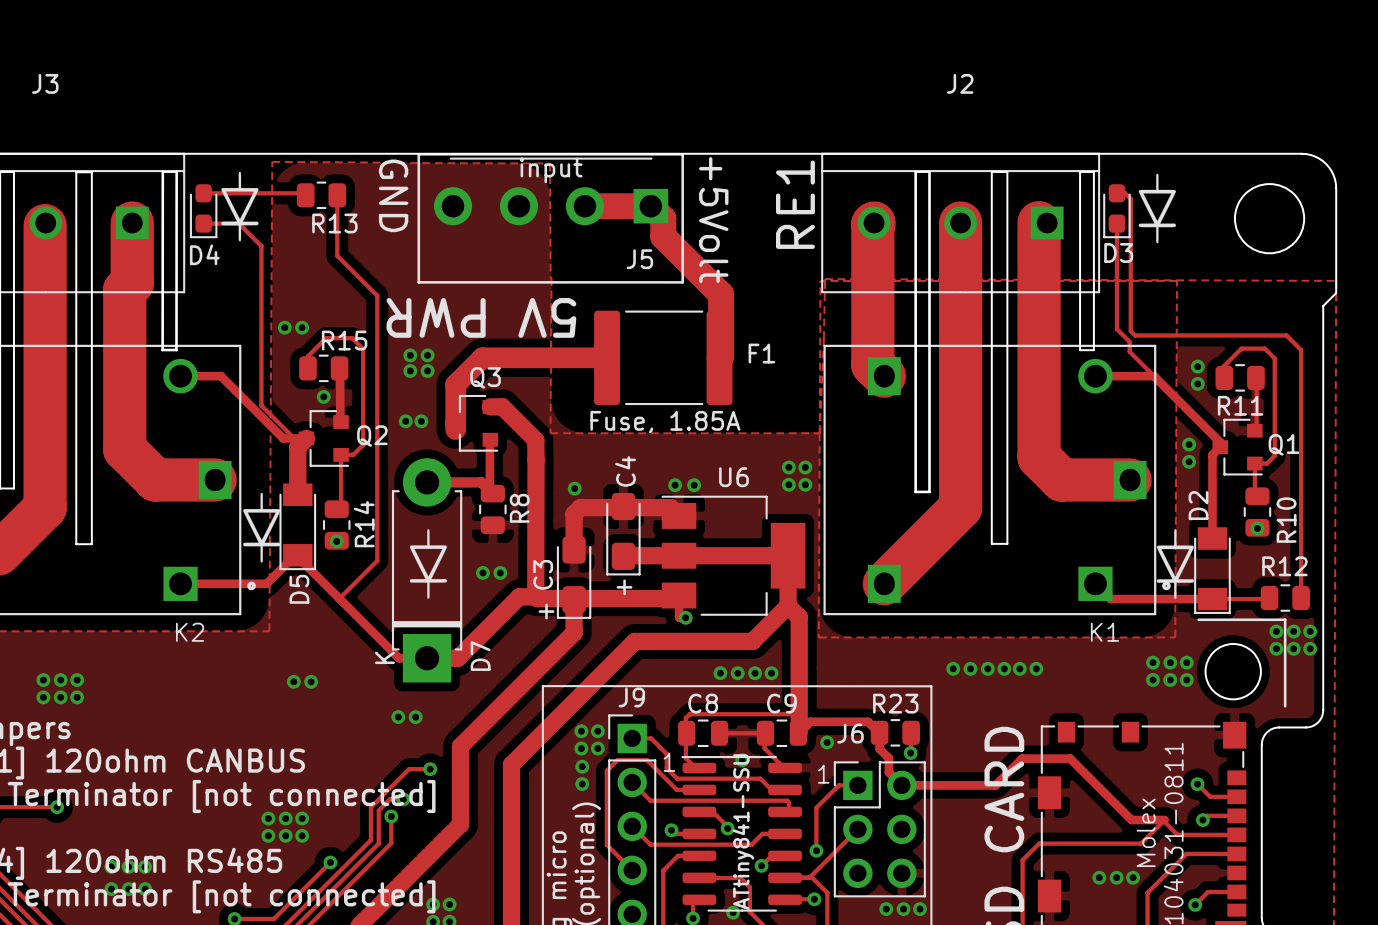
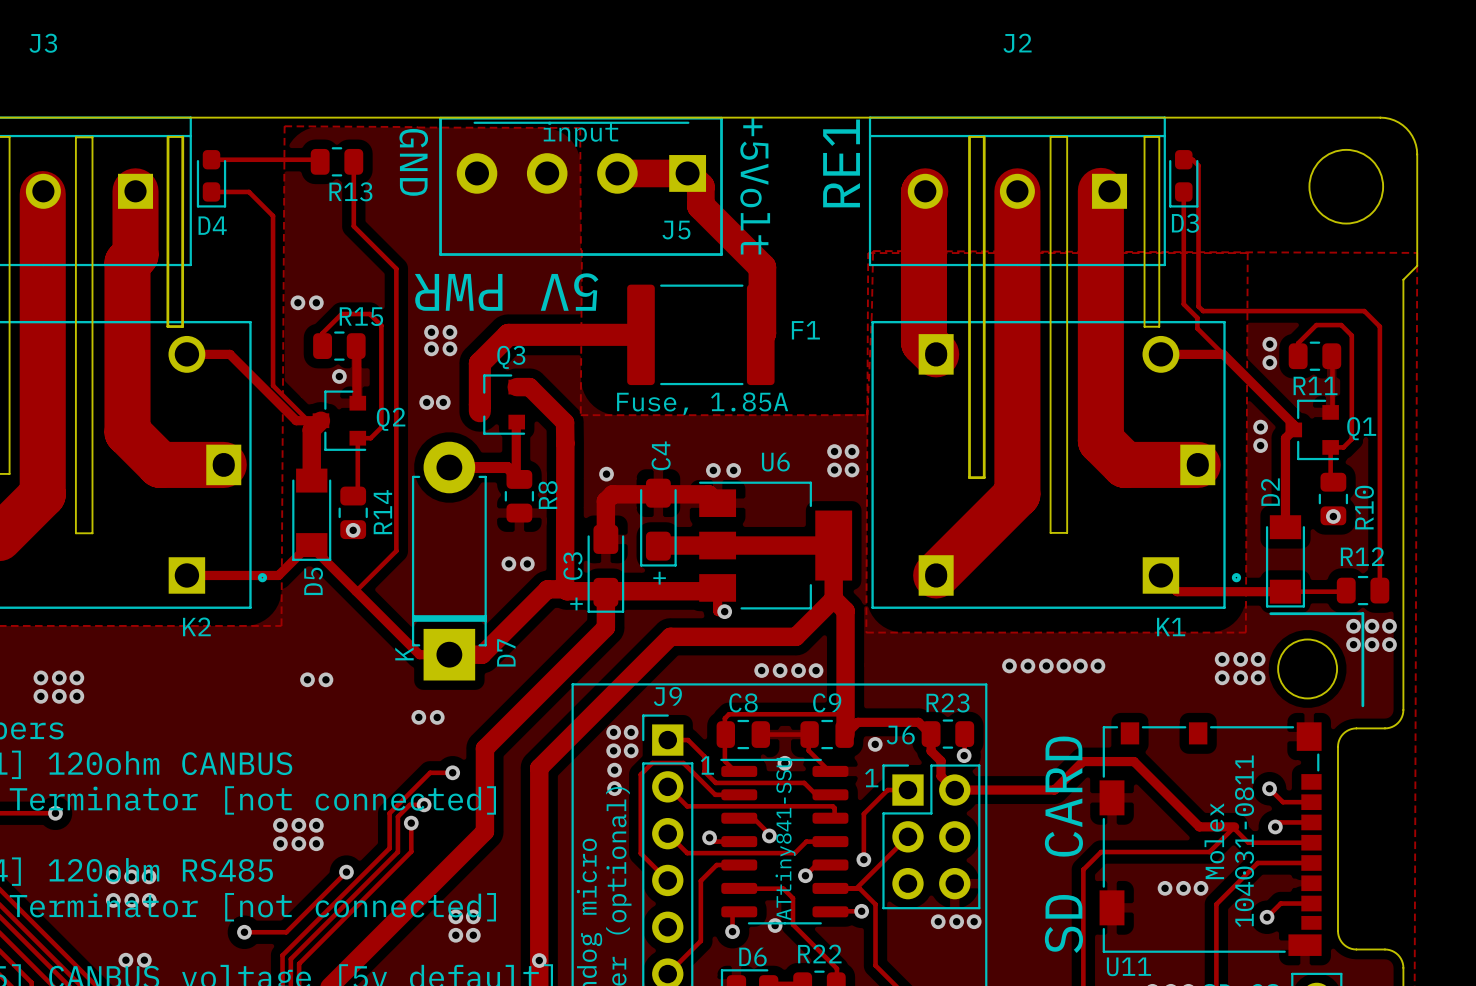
drawing: [221, 171, 259, 242] -> none
drawing: [1138, 173, 1176, 244] -> none
drawing: [243, 492, 281, 563] -> none
drawing: [409, 529, 448, 599] -> none
drawing: [1156, 529, 1194, 599] -> none

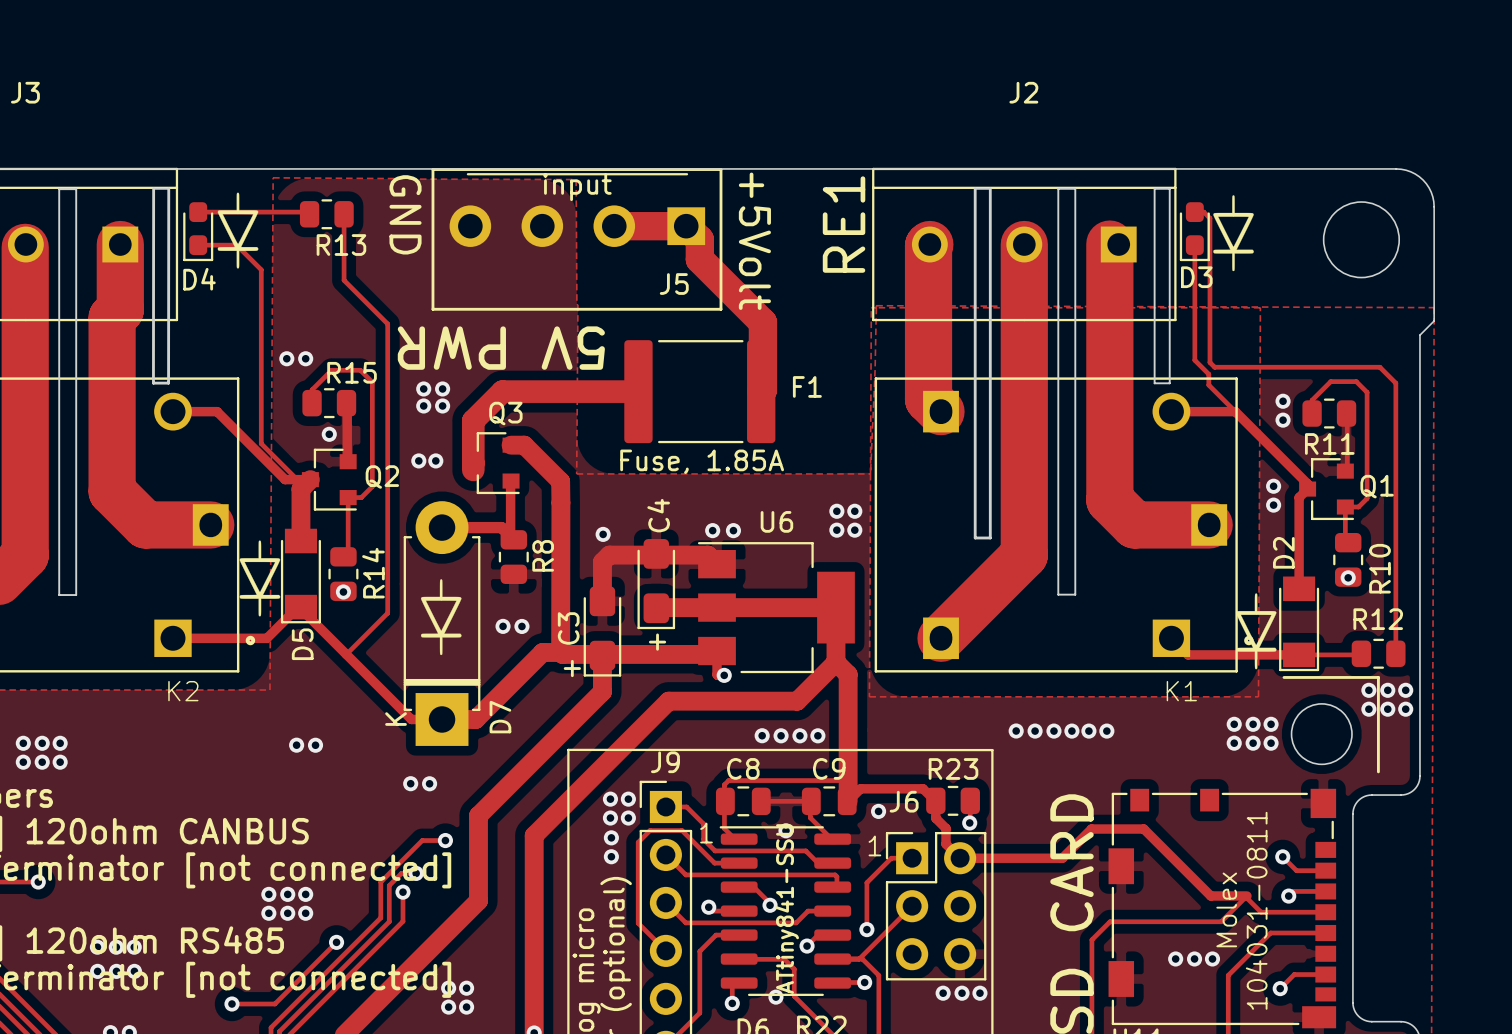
drawing: none -> [217, 192, 259, 269]
drawing: none -> [1213, 195, 1254, 272]
drawing: none -> [239, 540, 281, 617]
drawing: none -> [420, 579, 462, 656]
drawing: none -> [1235, 593, 1277, 670]

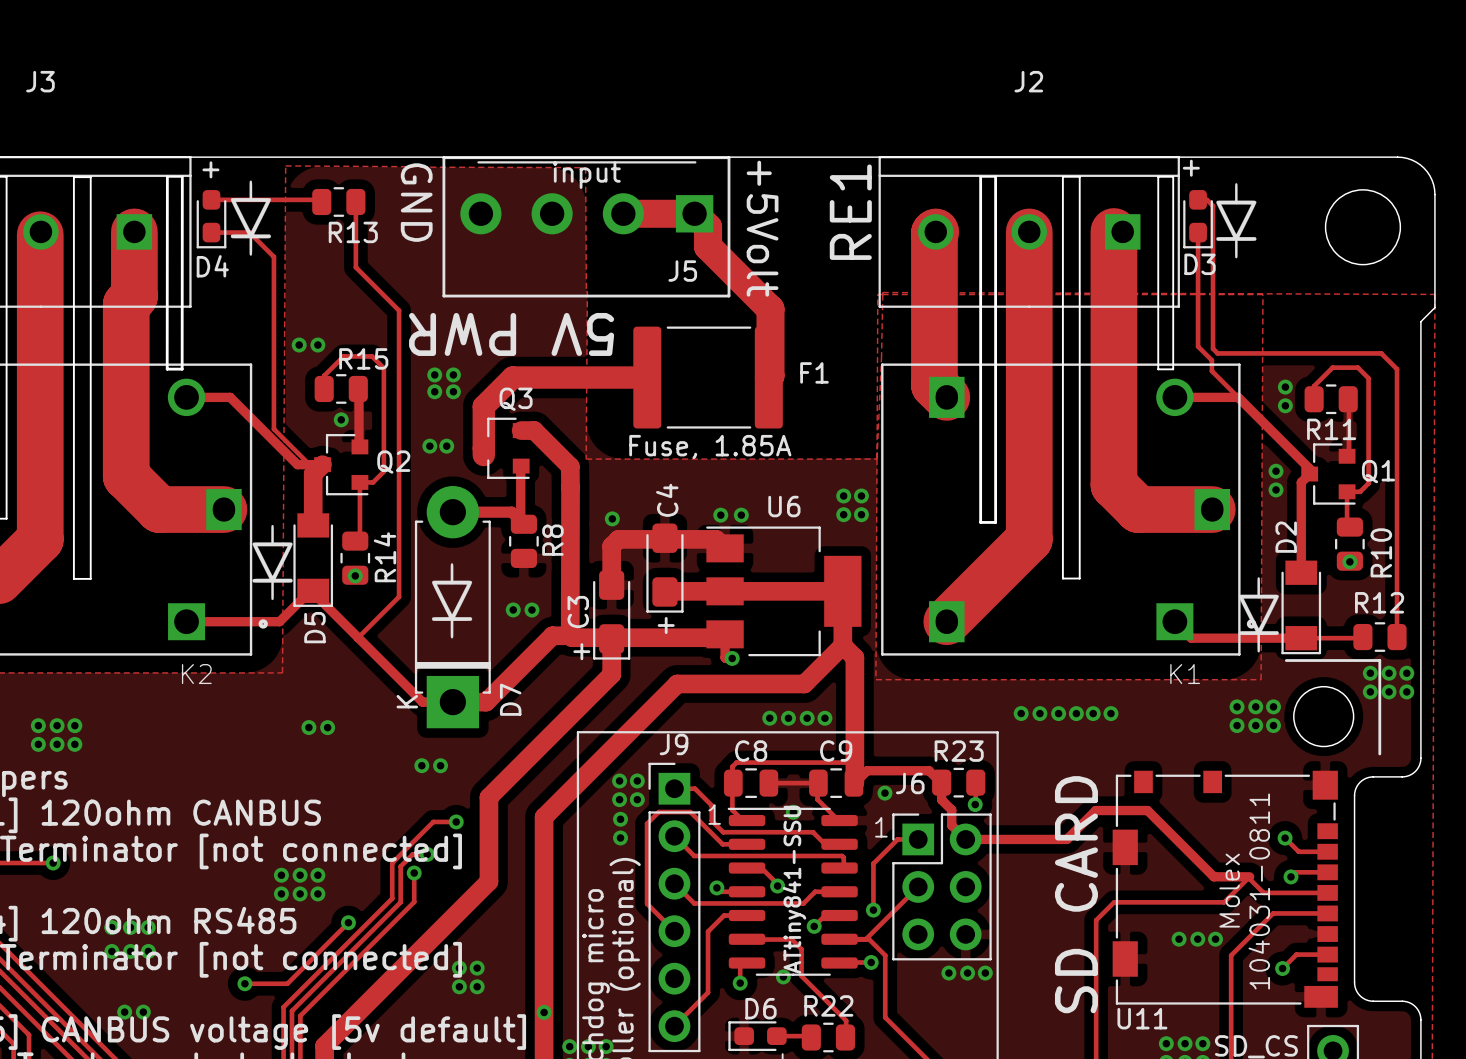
text: none -> + (1191, 168)
text: none -> + (210, 169)

